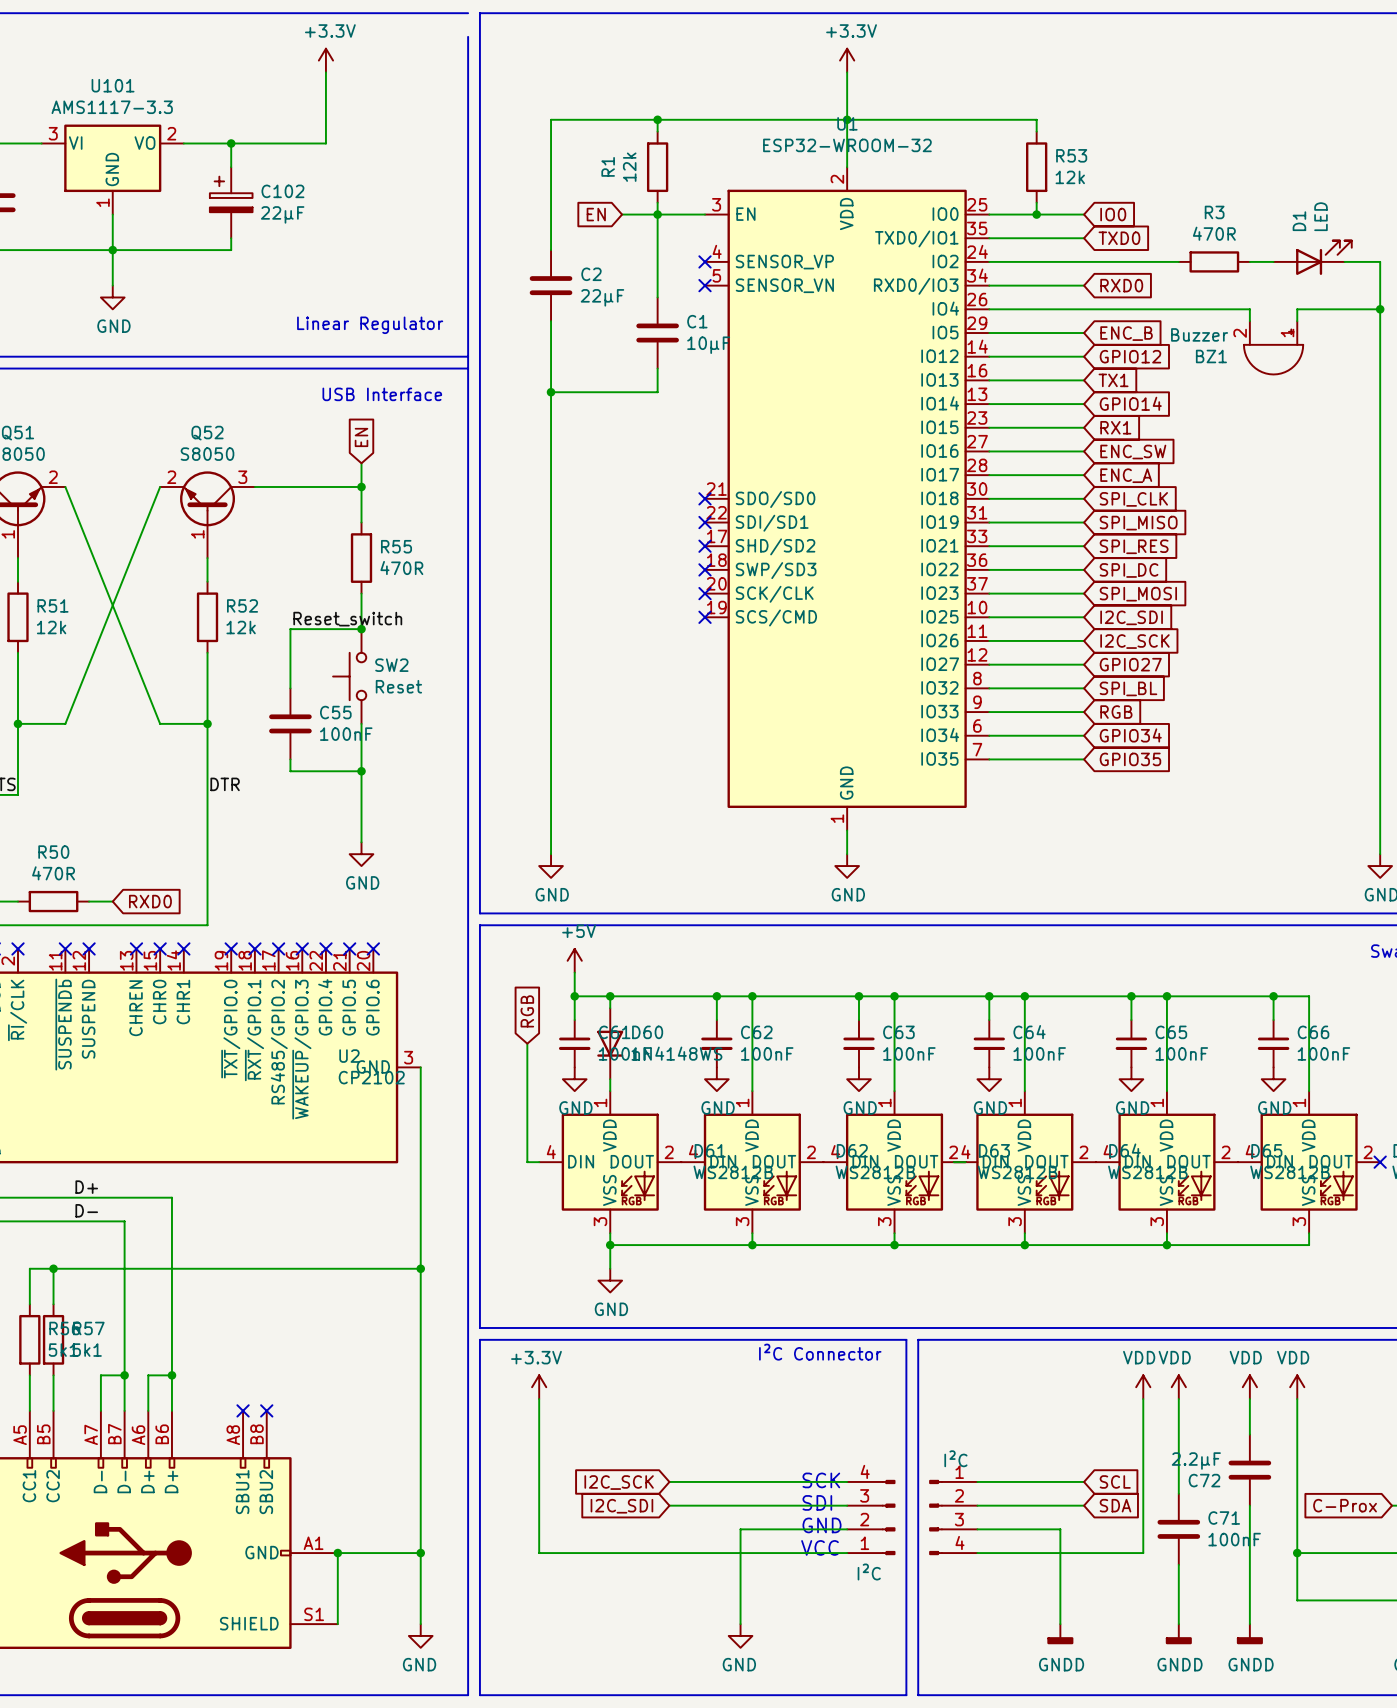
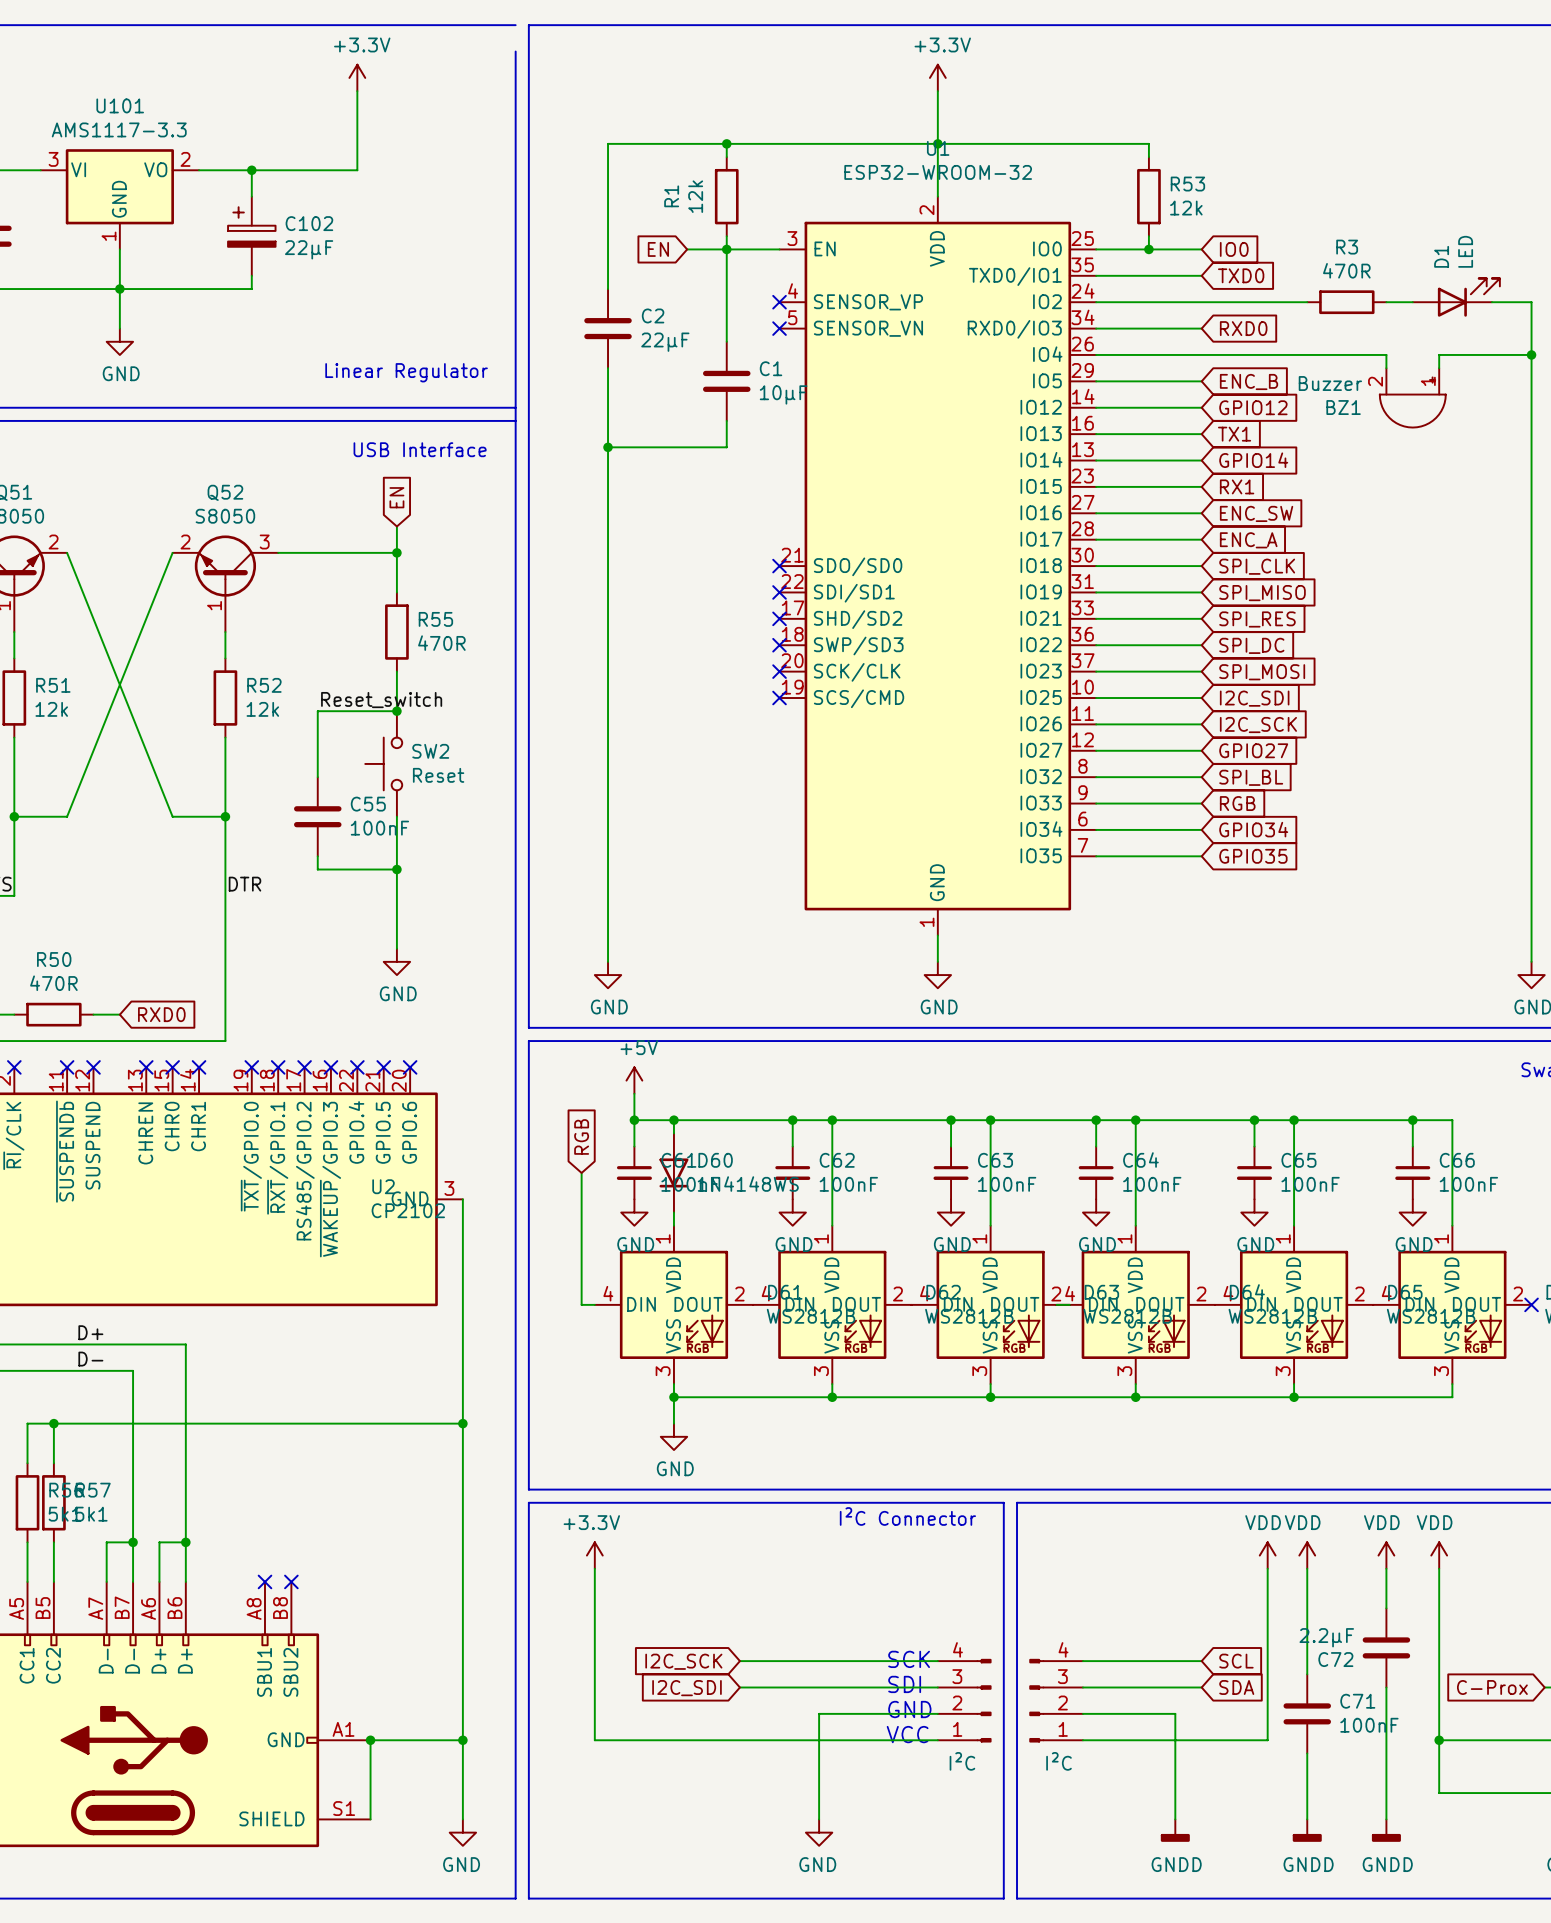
part flip: as is (935, 1517) -> up-down (1036, 1700)

